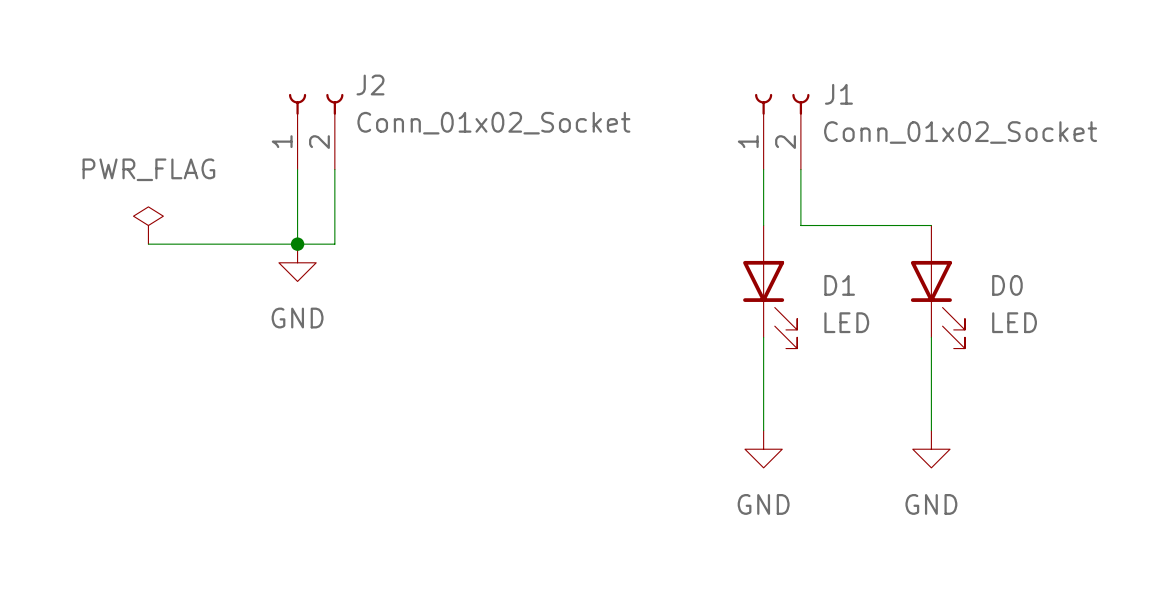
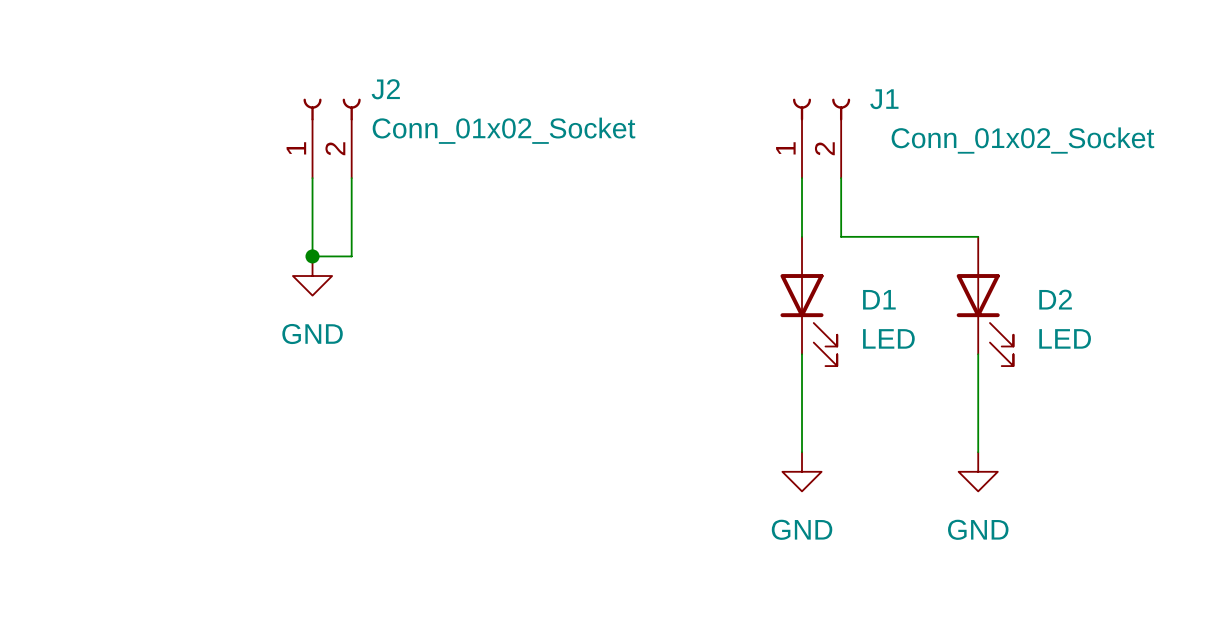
power symbol: PWR_FLAG (148, 225) -> none
wire: (148, 244) (297, 244) -> none
D0 name: D0 (1007, 285) -> D2 (1055, 299)

